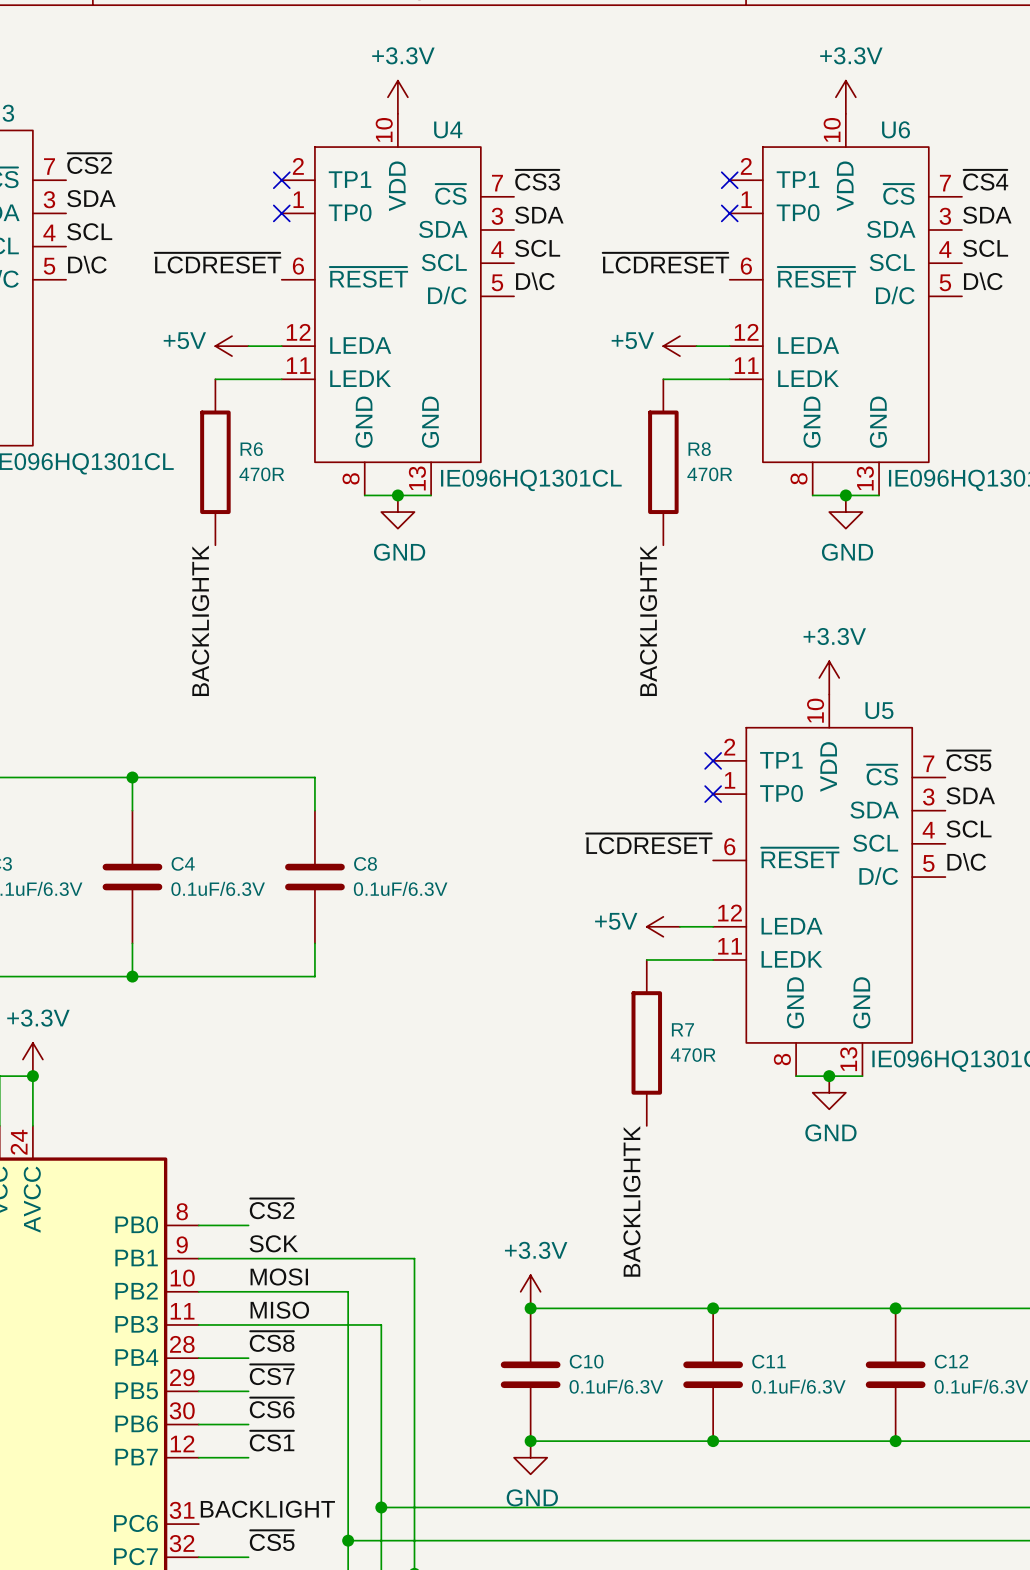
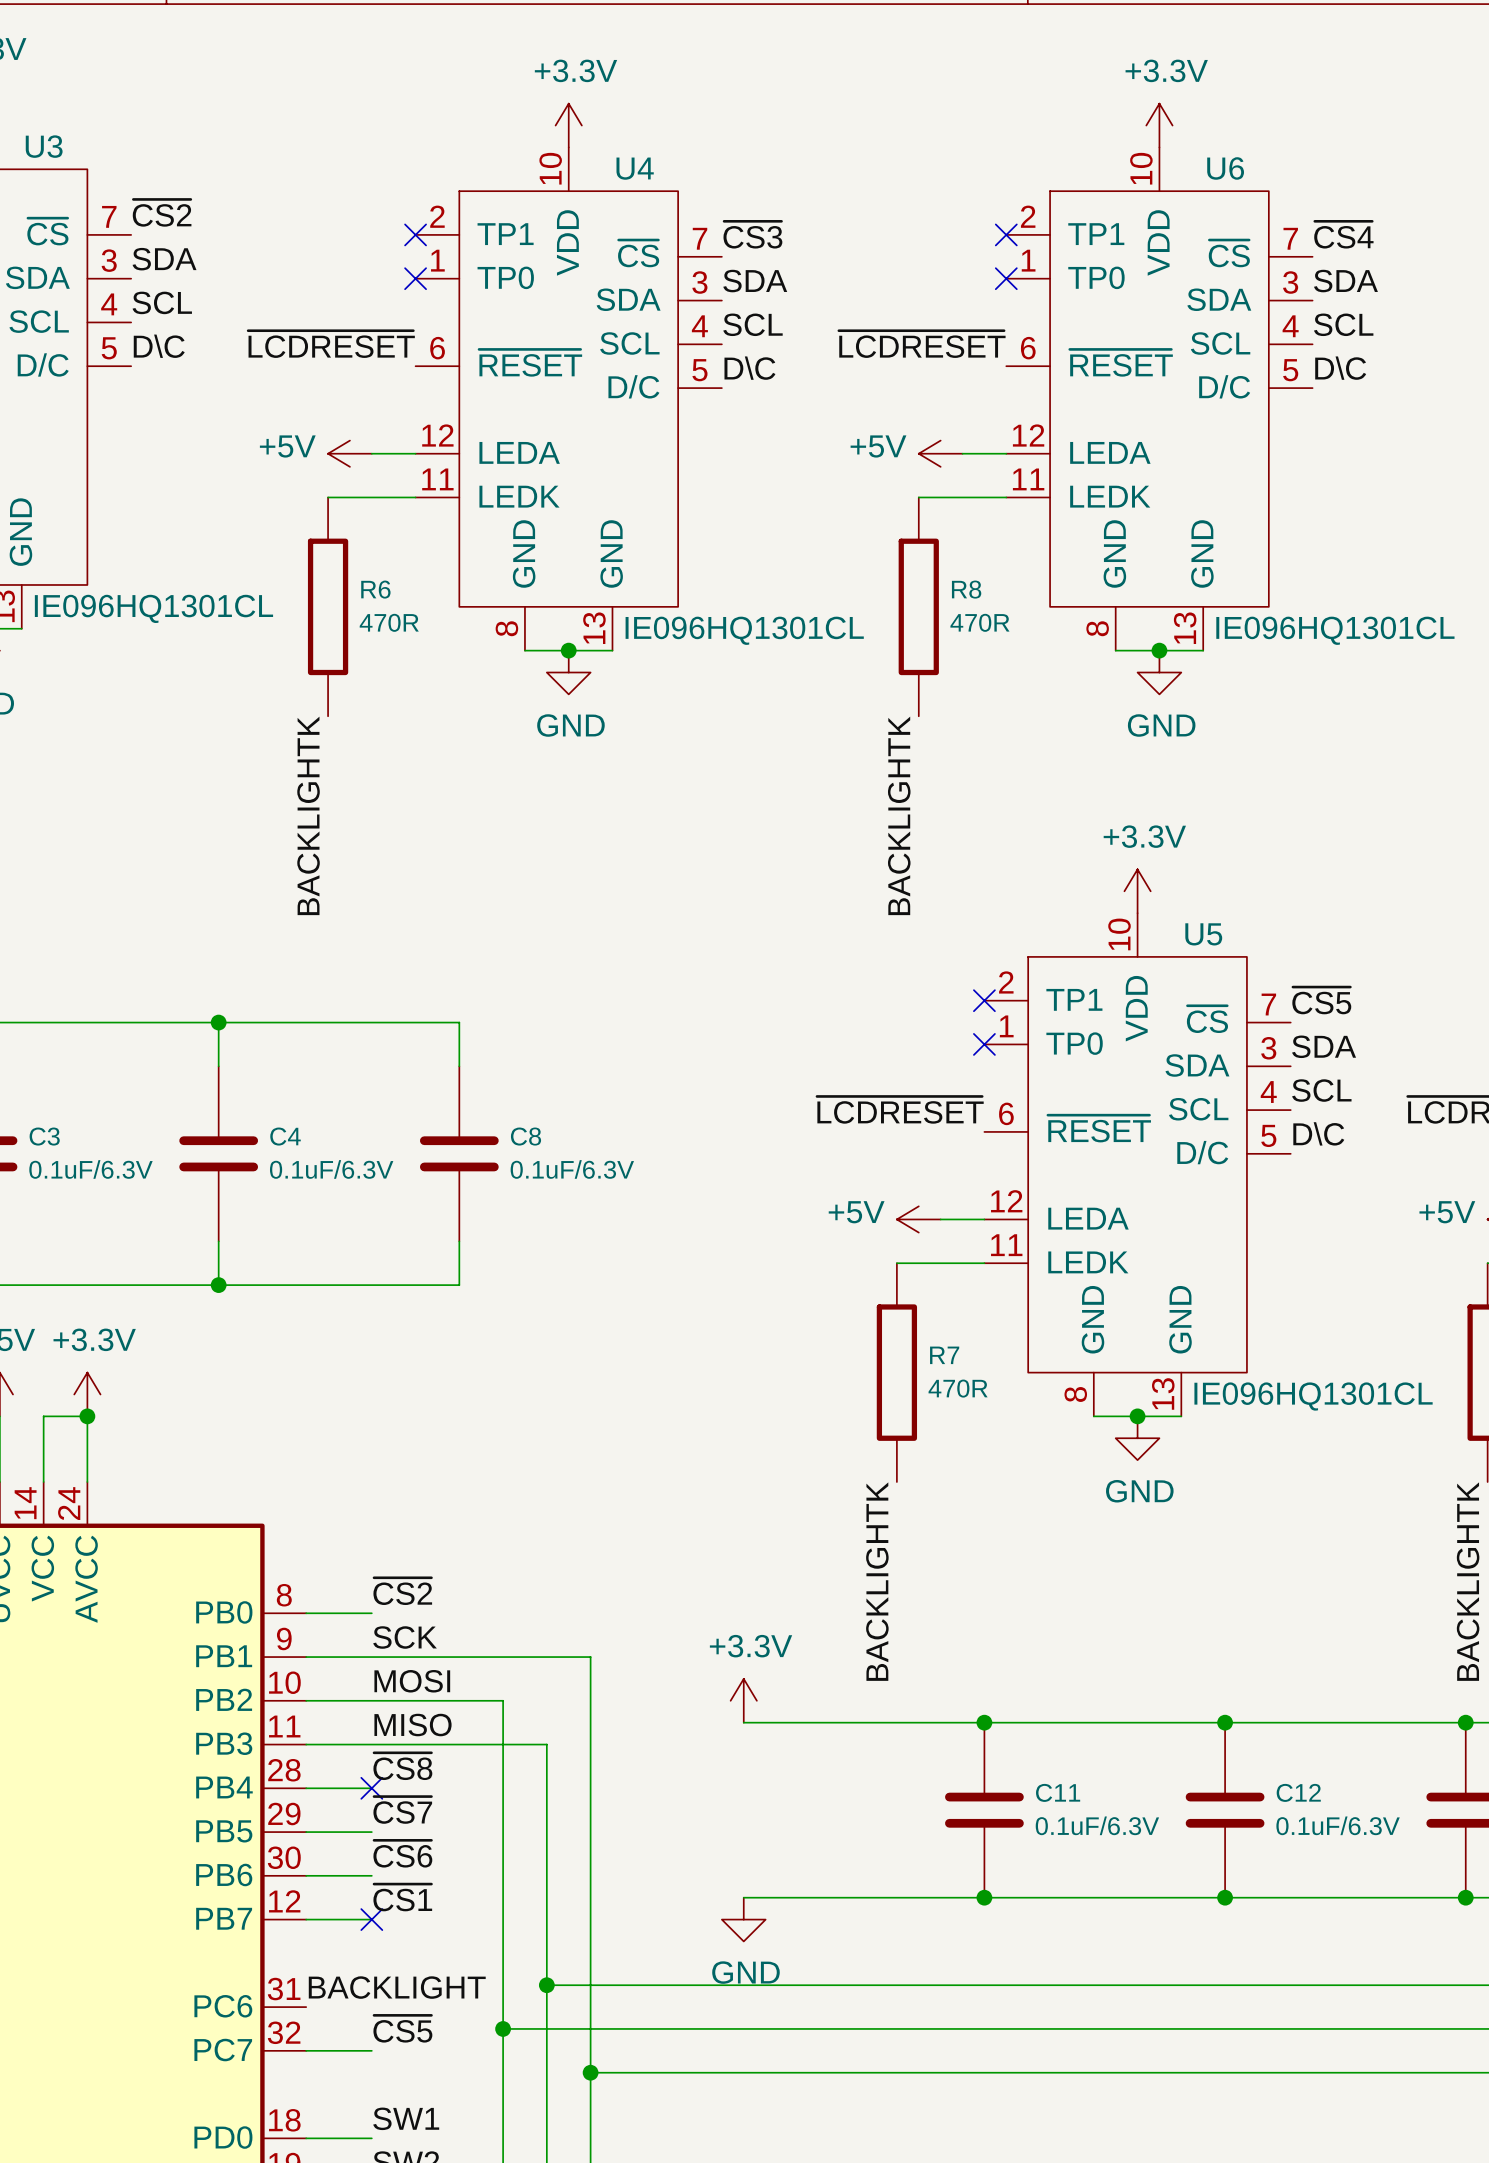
junction: (530, 1308) -> none
no-connect mark: none -> (371, 1788)
C10: 0.1uF/6.3V (530, 1374) -> none
junction: (530, 1441) -> none
no-connect mark: none -> (371, 1919)

